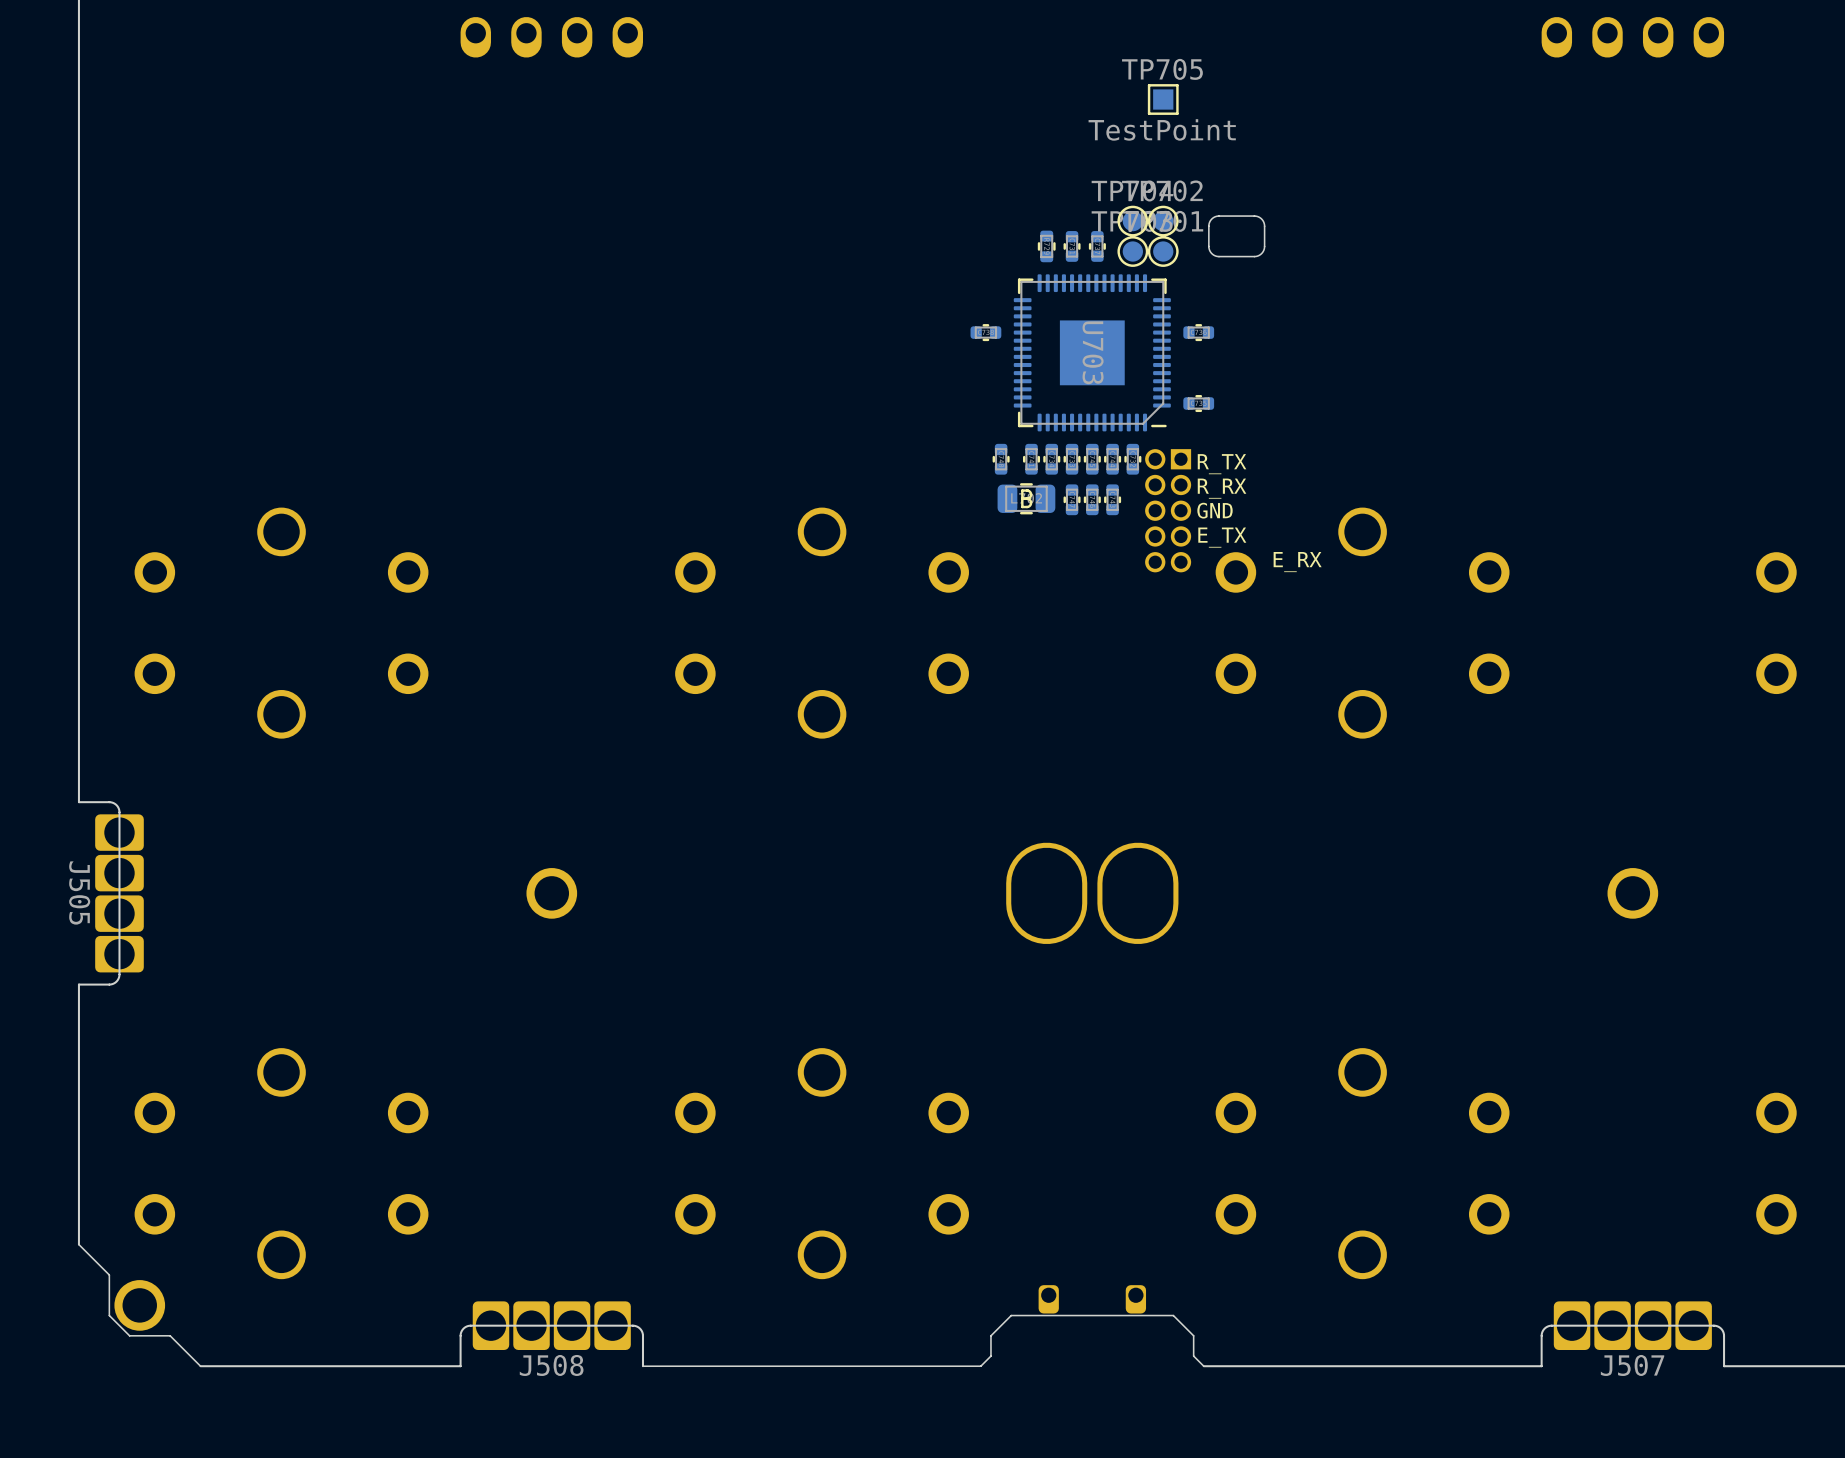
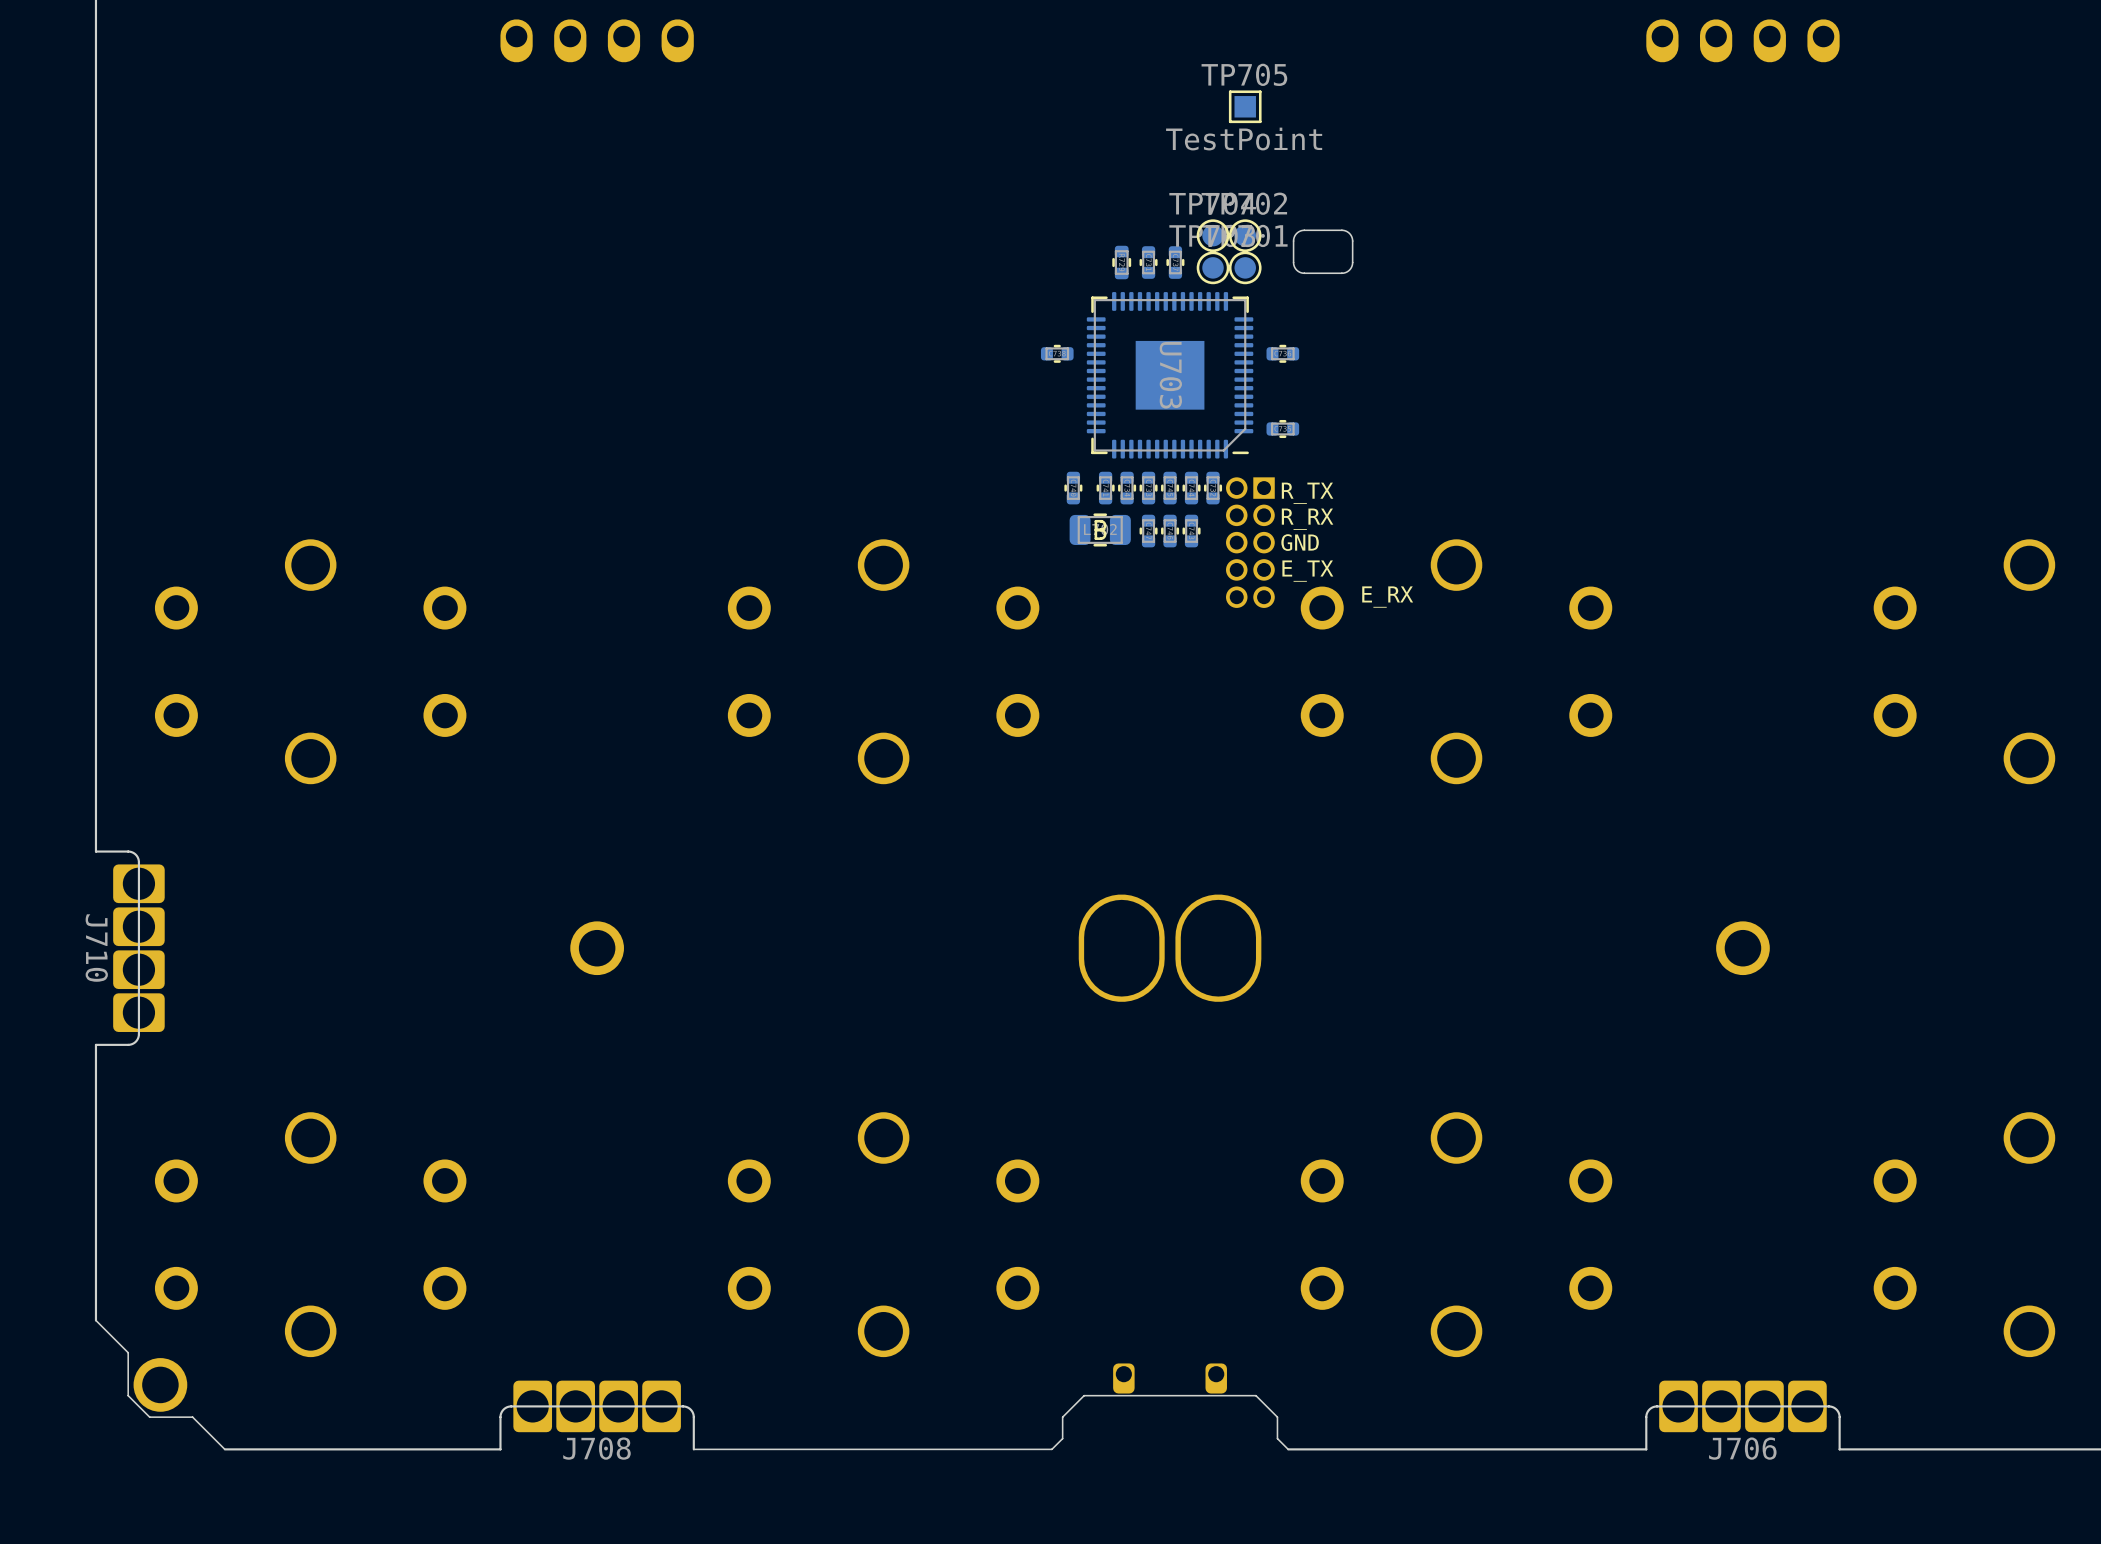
J505 name: J505 (79, 893) -> J710 (96, 948)
J508 name: J508 (551, 1365) -> J708 (596, 1448)
J507 name: J507 (1632, 1365) -> J706 (1742, 1448)

